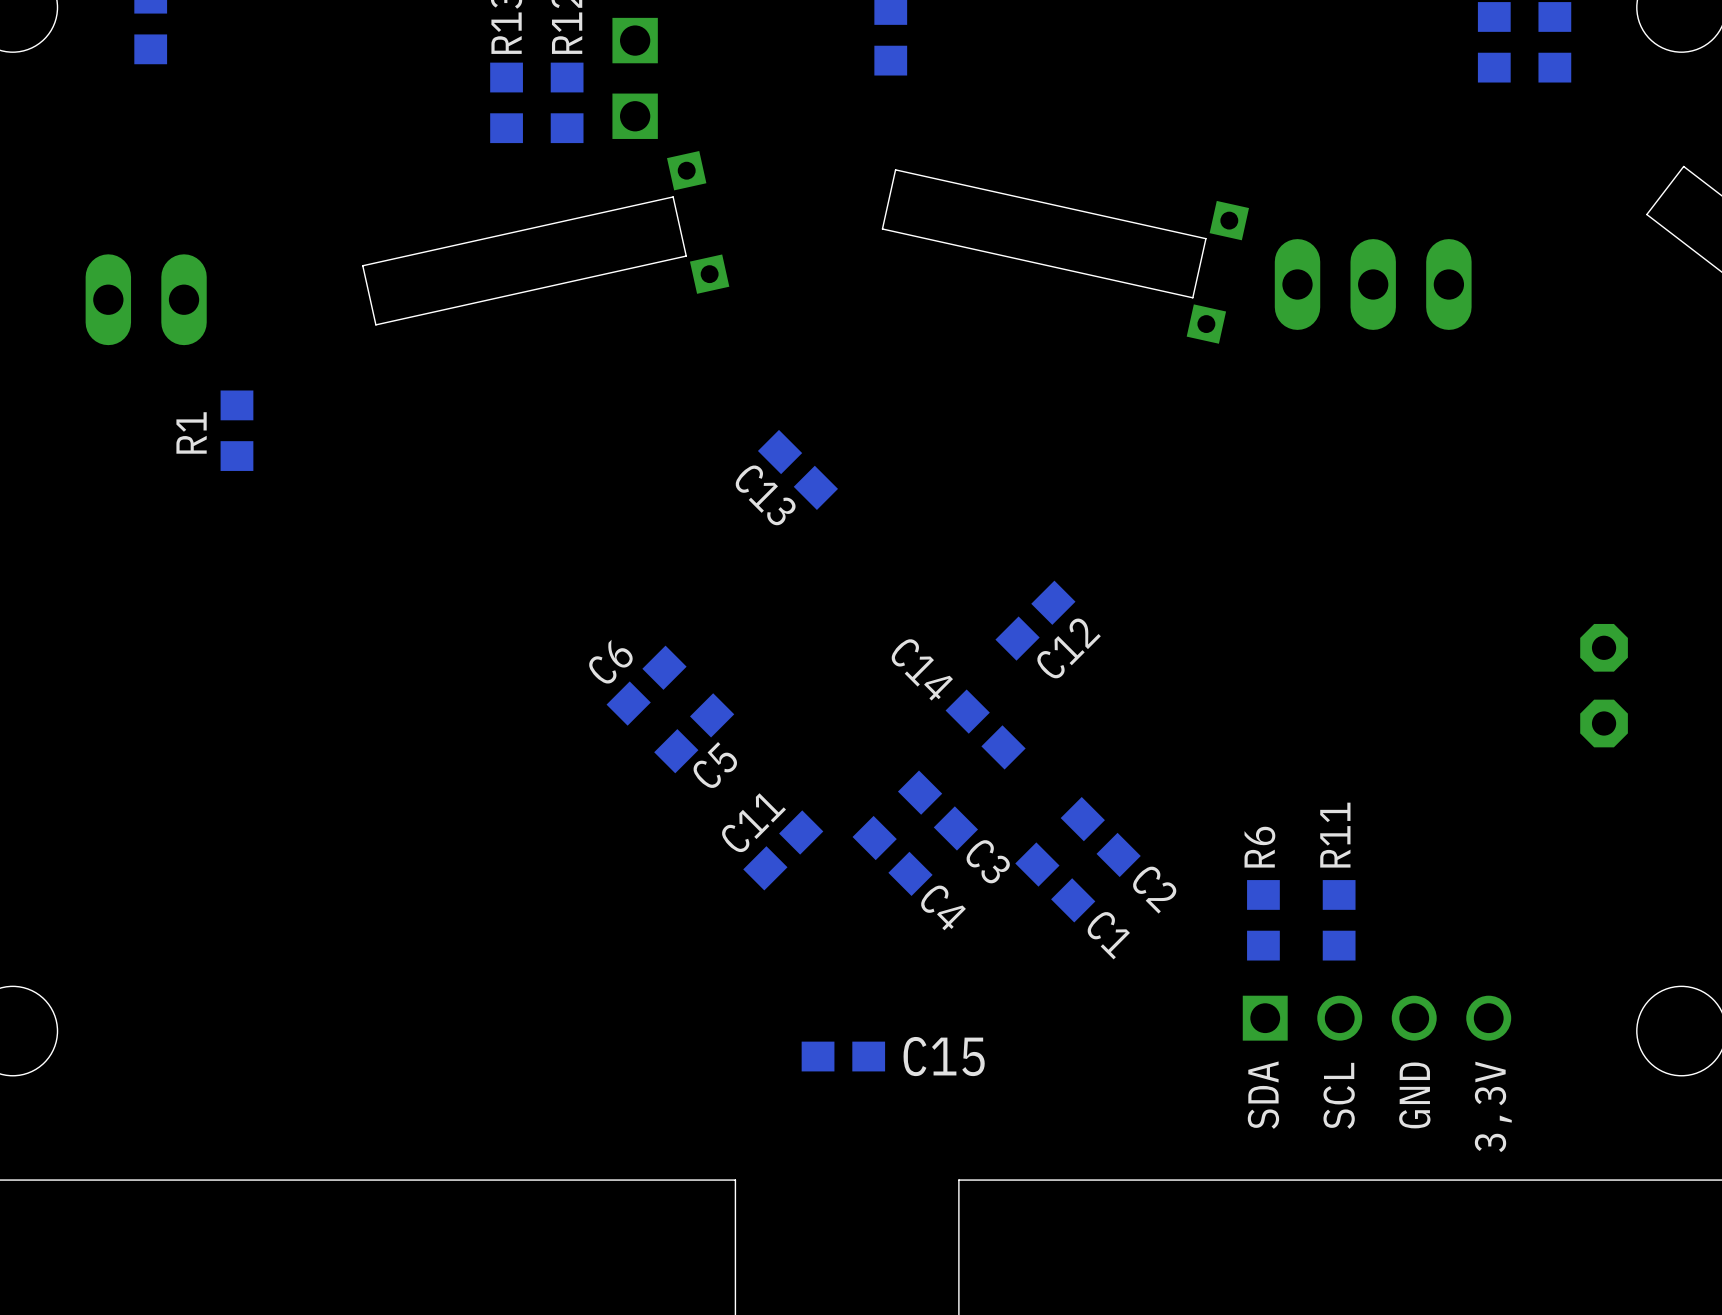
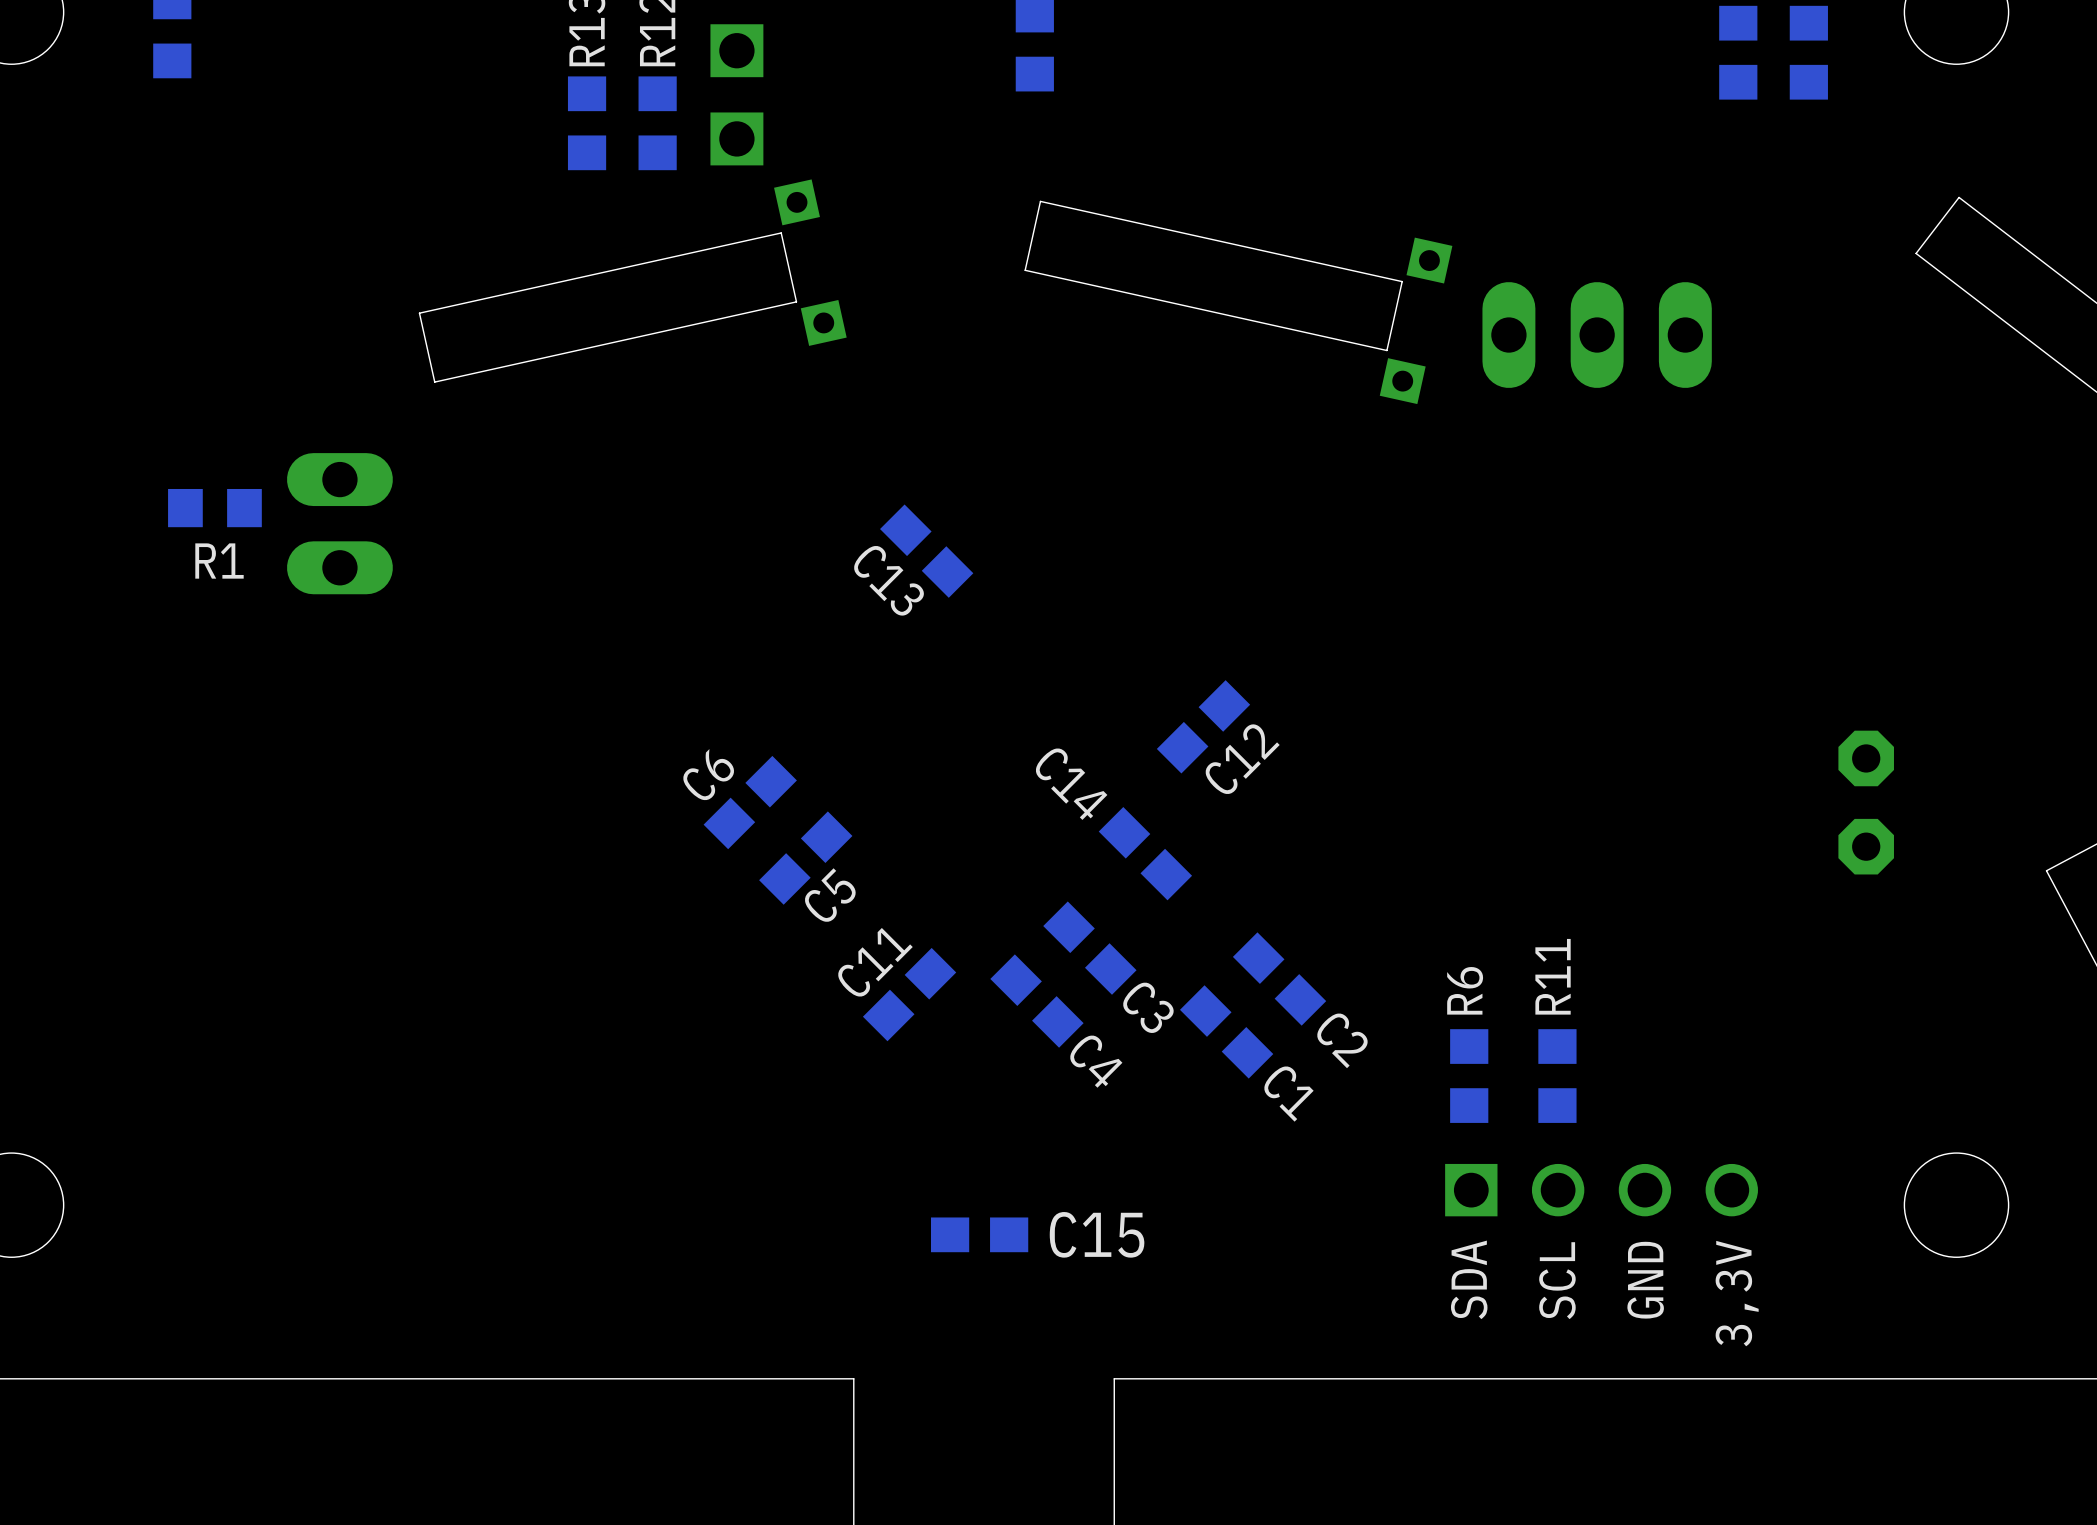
part rotation: 0° (146, 299) -> 90° clockwise (339, 523)
part position: (146, 299) -> (339, 523)
R1 rotation: 0° (236, 430) -> 90° clockwise (214, 508)
R1 position: (236, 430) -> (214, 508)
R1 name position: R1 (191, 432) -> R1 (219, 561)

